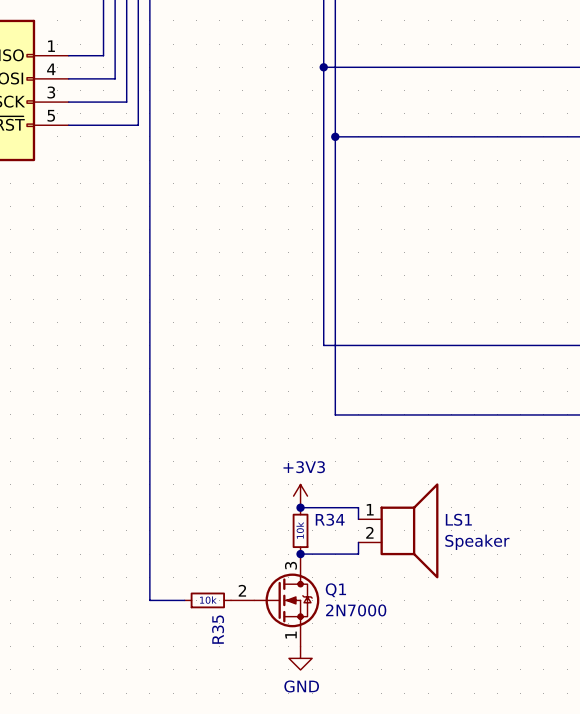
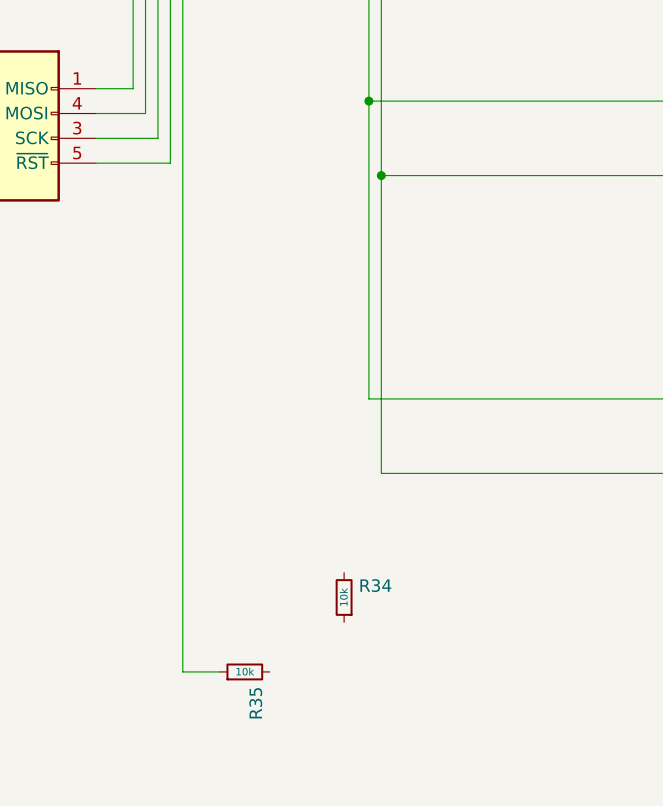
power symbol: +3V3 (300, 496) -> none
wire: (300, 507) (358, 507) (358, 519) -> none
junction: (300, 507) -> none
LS1: Speaker (398, 530) -> none
wire: (358, 542) (358, 554) (300, 554) -> none
junction: (300, 554) -> none
Q1: 2N7000 (275, 600) -> none
power symbol: GND (300, 658) -> none

